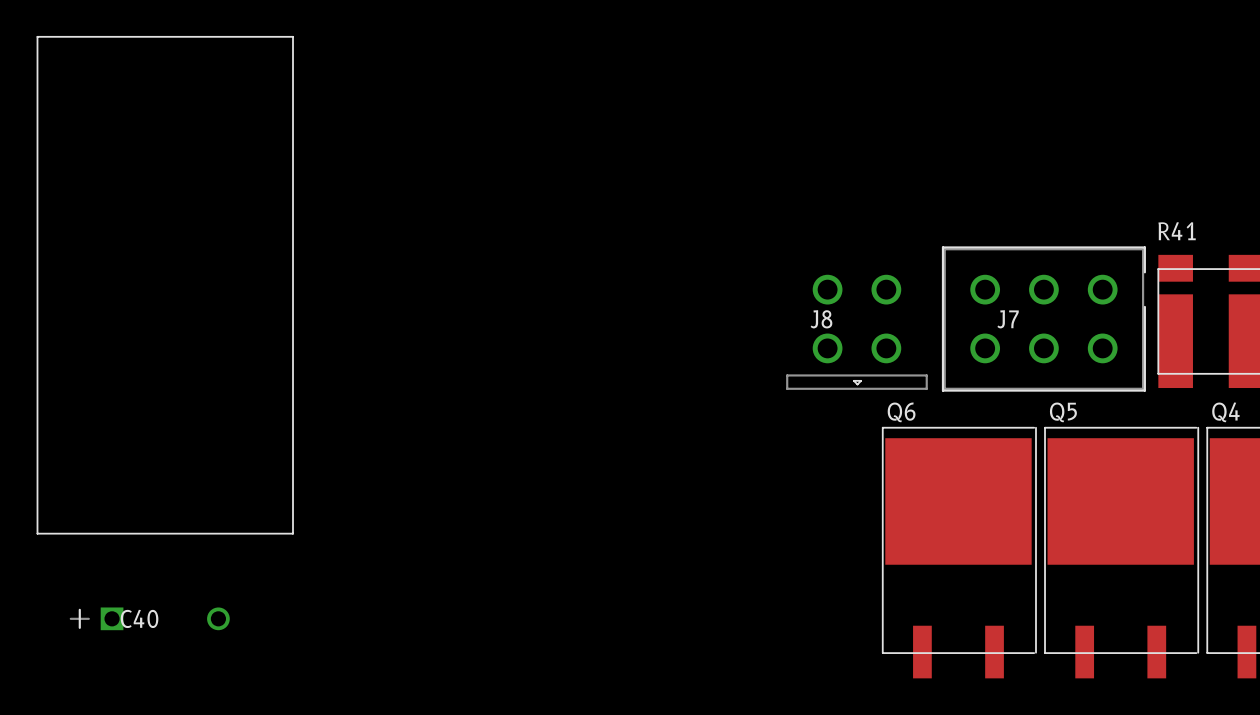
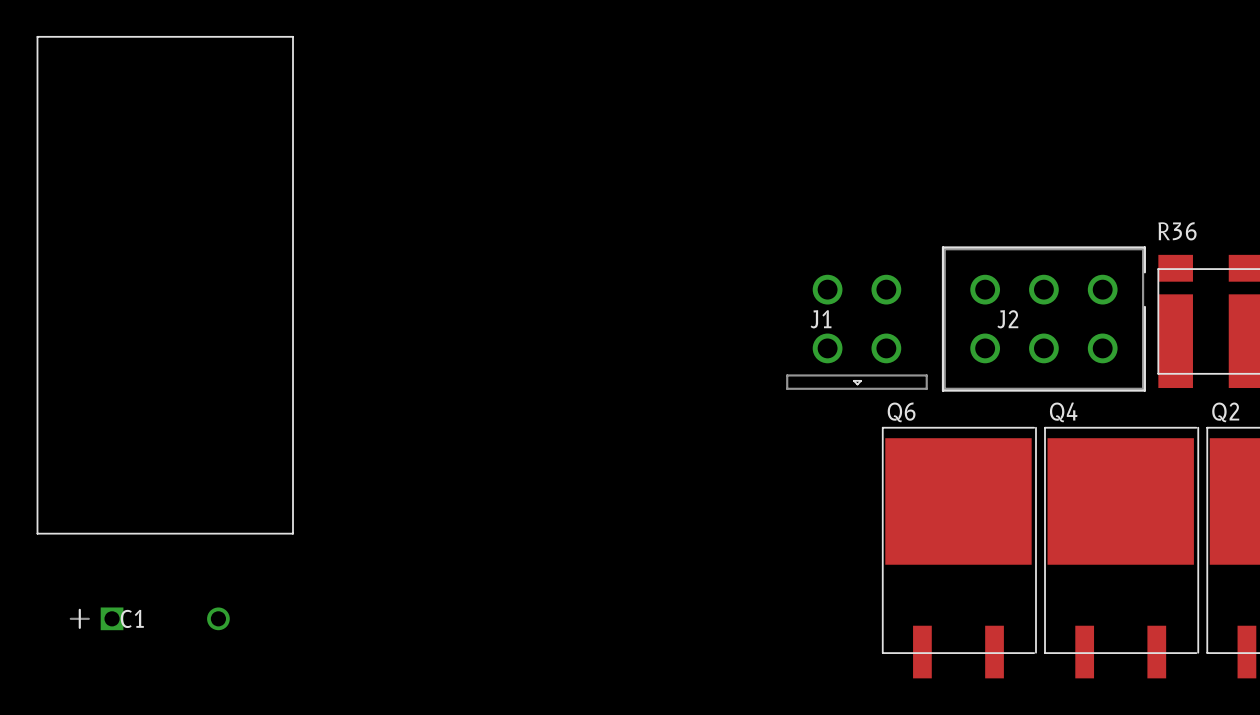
R41 name: R41 (1177, 231) -> R36 (1177, 231)
J8 name: J8 (821, 319) -> J1 (821, 319)
J7 name: J7 (1008, 319) -> J2 (1007, 319)
Q5 name: Q5 (1063, 412) -> Q4 (1063, 412)
Q4 name: Q4 (1225, 412) -> Q2 (1225, 412)
C40 name: C40 (139, 618) -> C1 (132, 618)

